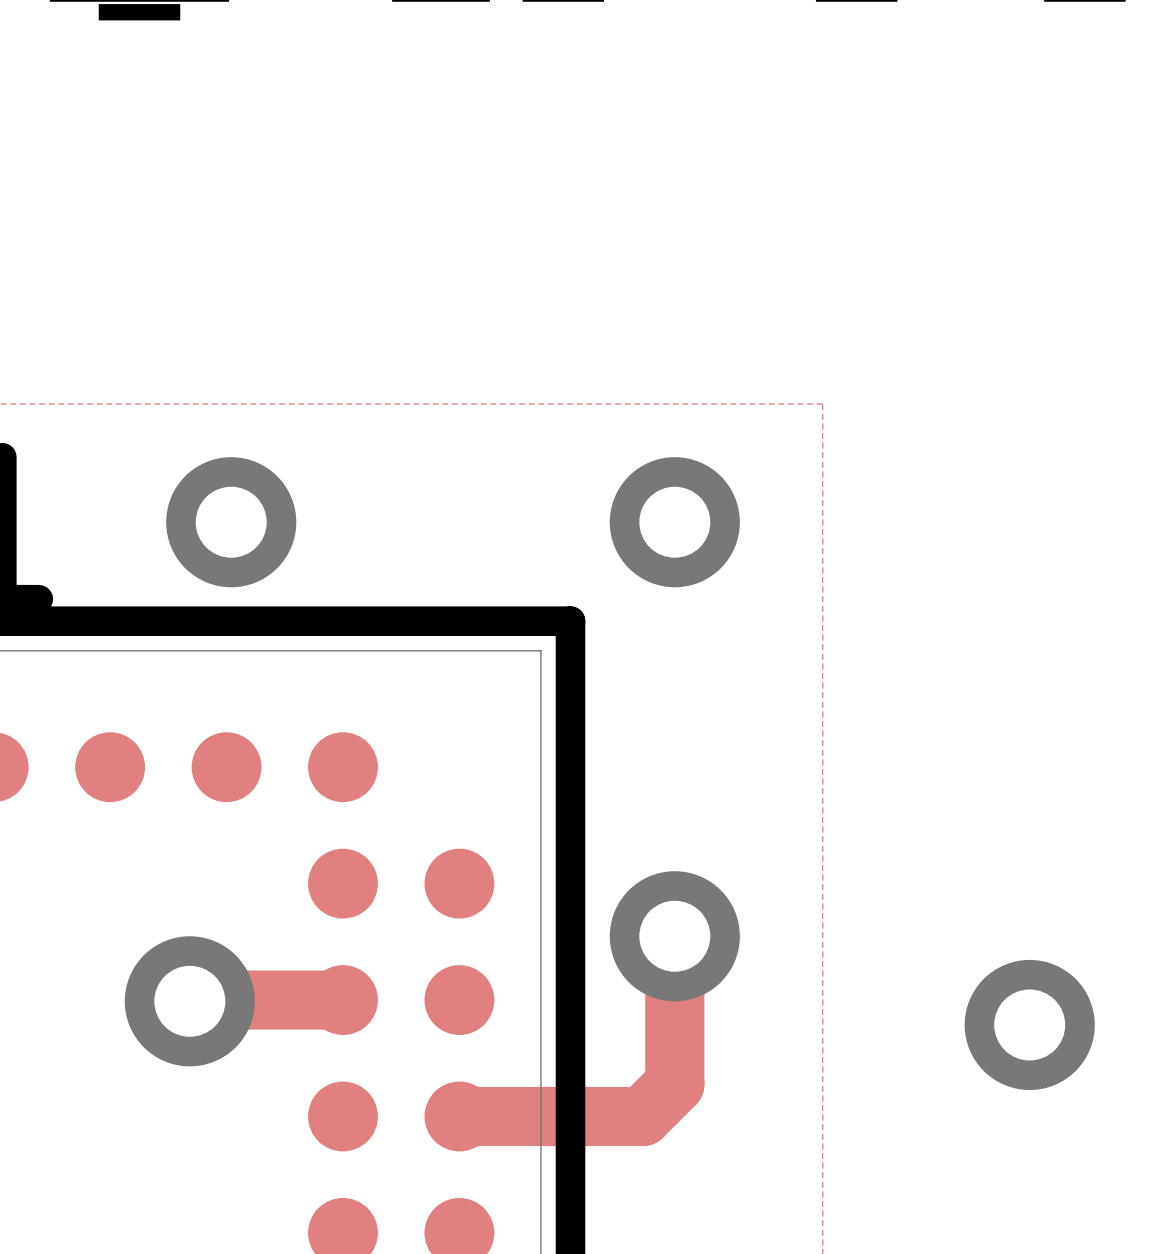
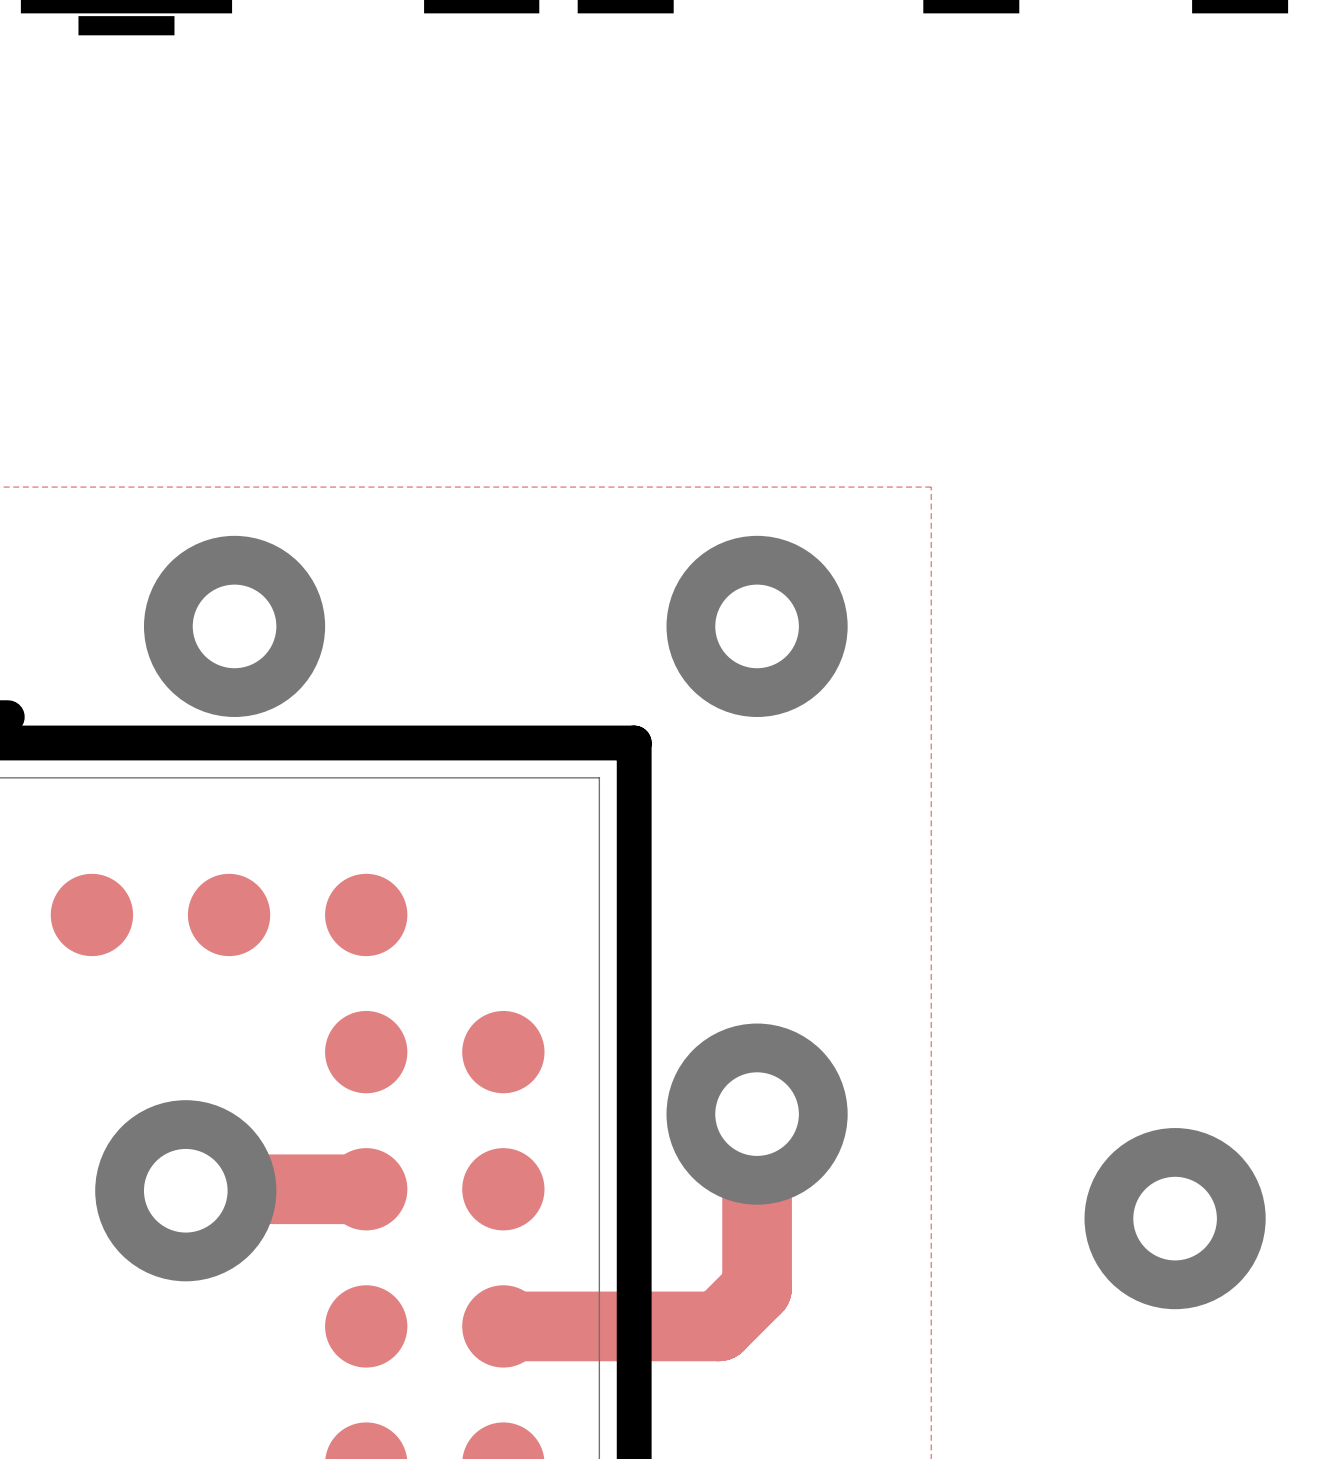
via size: [166, 457, 297, 588] -> [143, 535, 326, 717]
via size: [609, 457, 740, 588] -> [666, 535, 848, 717]
via size: [609, 871, 740, 1002] -> [666, 1023, 848, 1205]
via size: [124, 936, 255, 1067] -> [95, 1100, 277, 1282]
via size: [964, 959, 1095, 1091] -> [1084, 1128, 1266, 1310]

